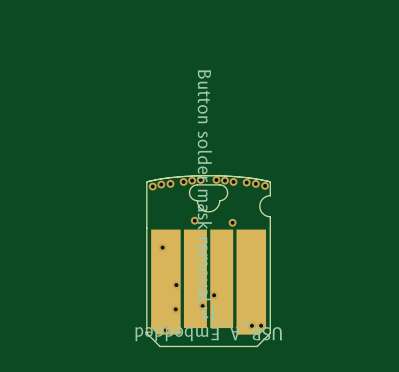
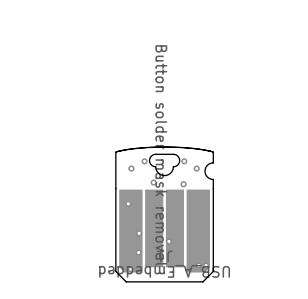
via: (200, 179) -> none
via: (216, 179) -> none
via: (192, 180) -> none
via: (224, 180) -> none
via: (183, 181) -> none
via: (233, 181) -> none
via: (246, 182) -> none
via: (170, 183) -> none
via: (255, 183) -> none
via: (161, 184) -> none
via: (265, 185) -> none
via: (152, 186) -> none
via: none -> (144, 161)
via: none -> (184, 161)
via: none -> (131, 168)
via: none -> (196, 168)

